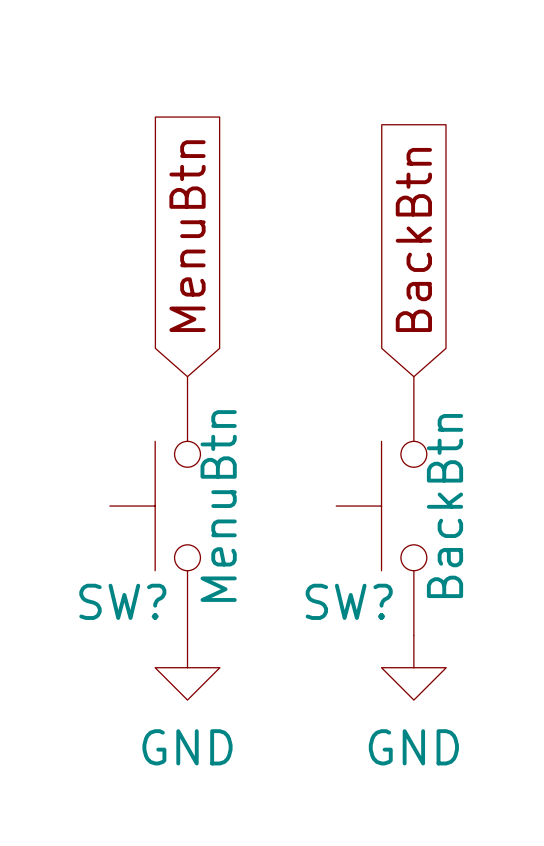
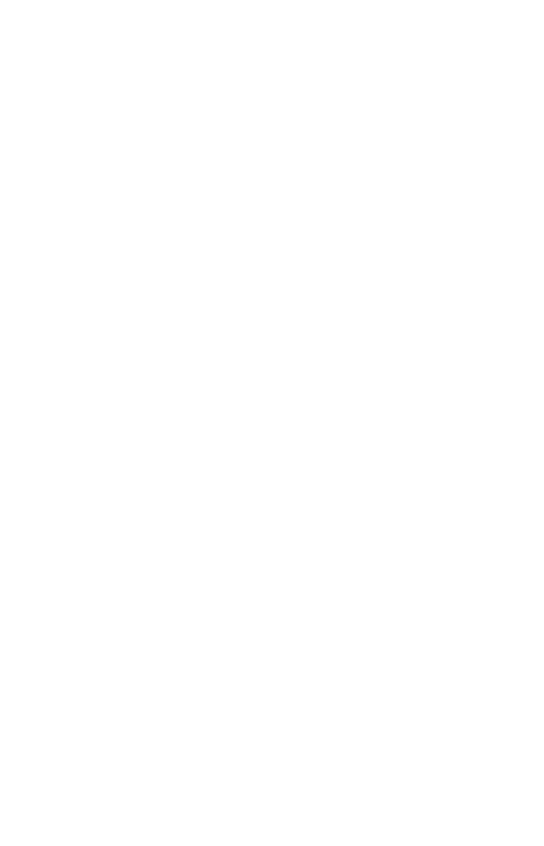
global label: MenuBtn (187, 236) -> none
global label: BackBtn (413, 239) -> none
SW?: MenuBtn (155, 506) -> none
SW?: BackBtn (381, 506) -> none
power symbol: GND (187, 667) -> none
power symbol: GND (413, 667) -> none

